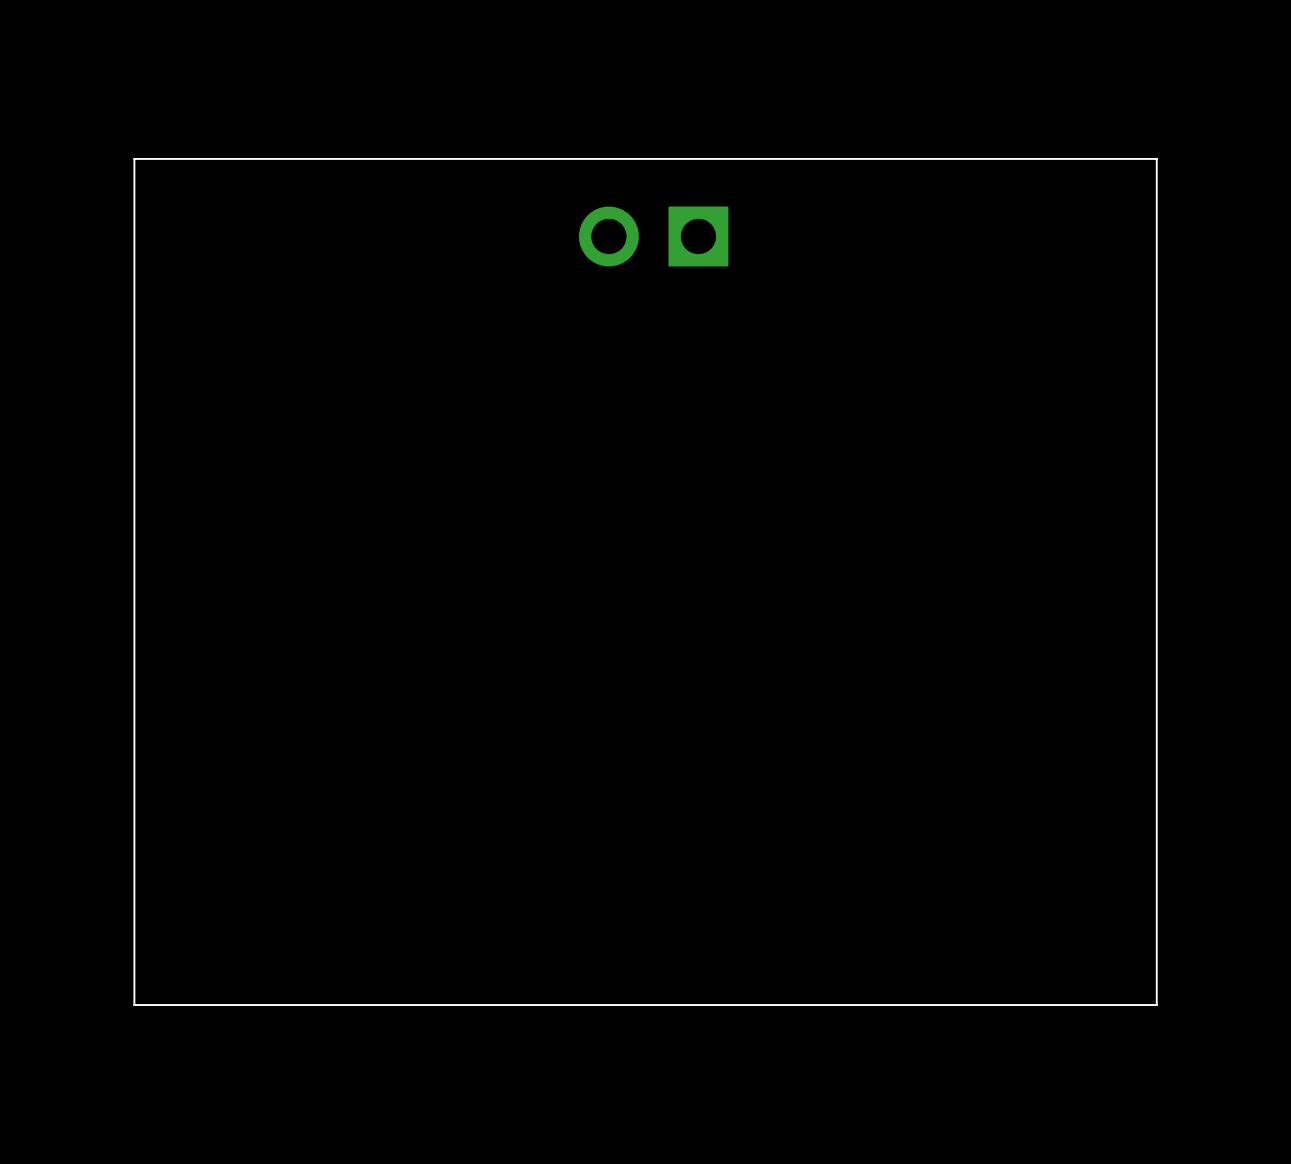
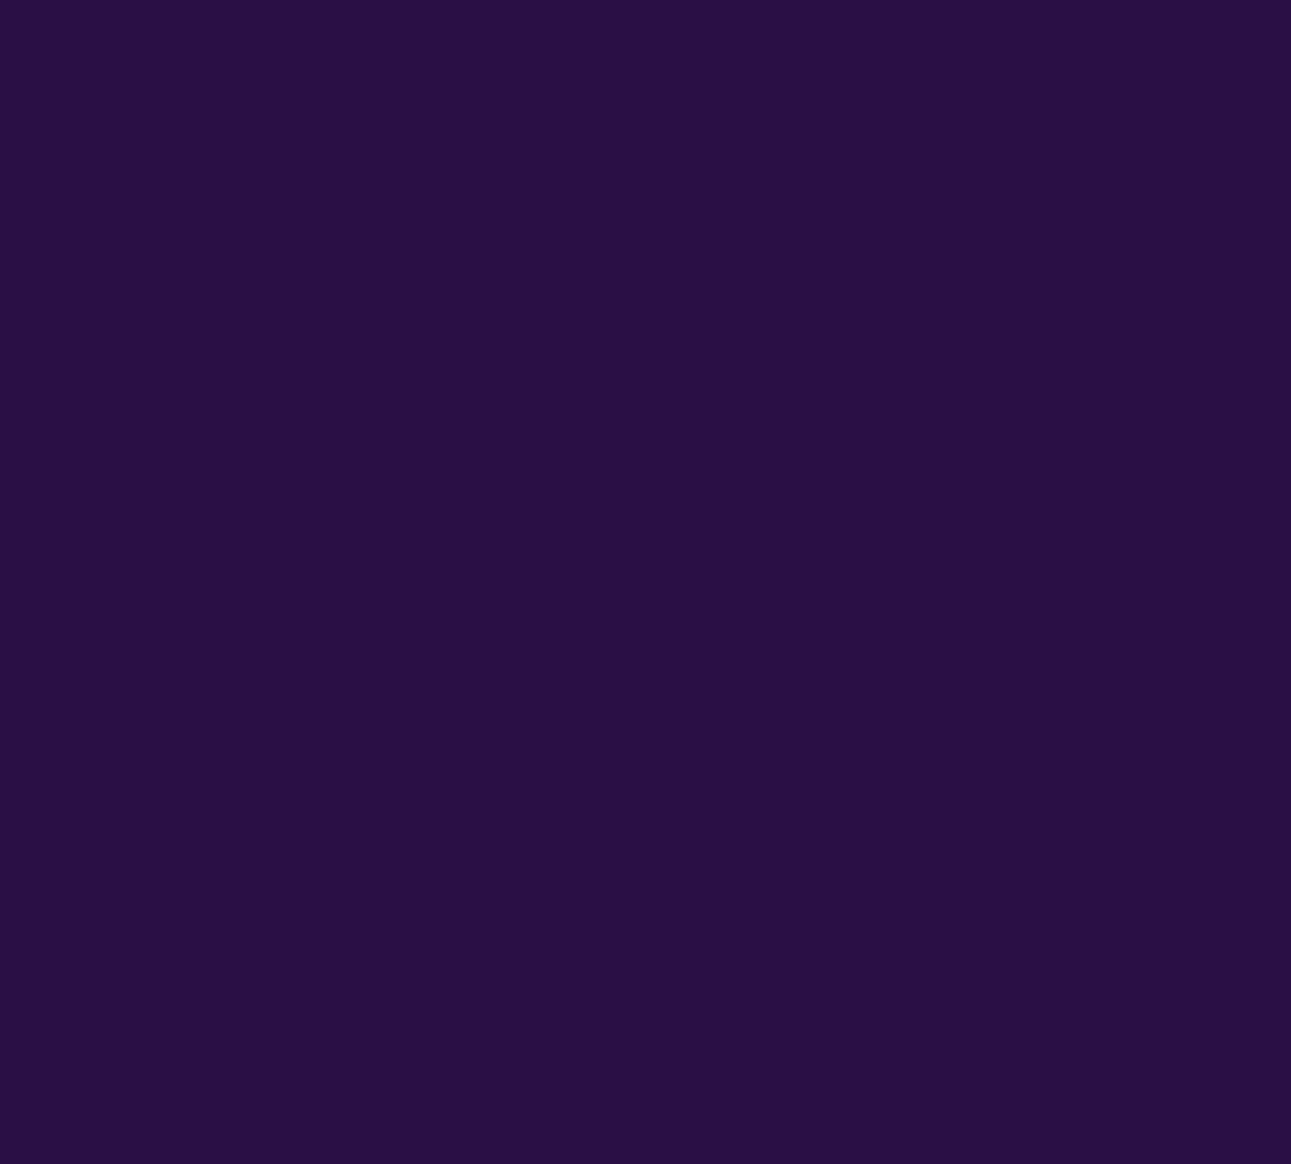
board edge: (1156, 158) (1156, 1005) (134, 1005) (134, 158) (1156, 158) -> none
part: (653, 236) -> none

